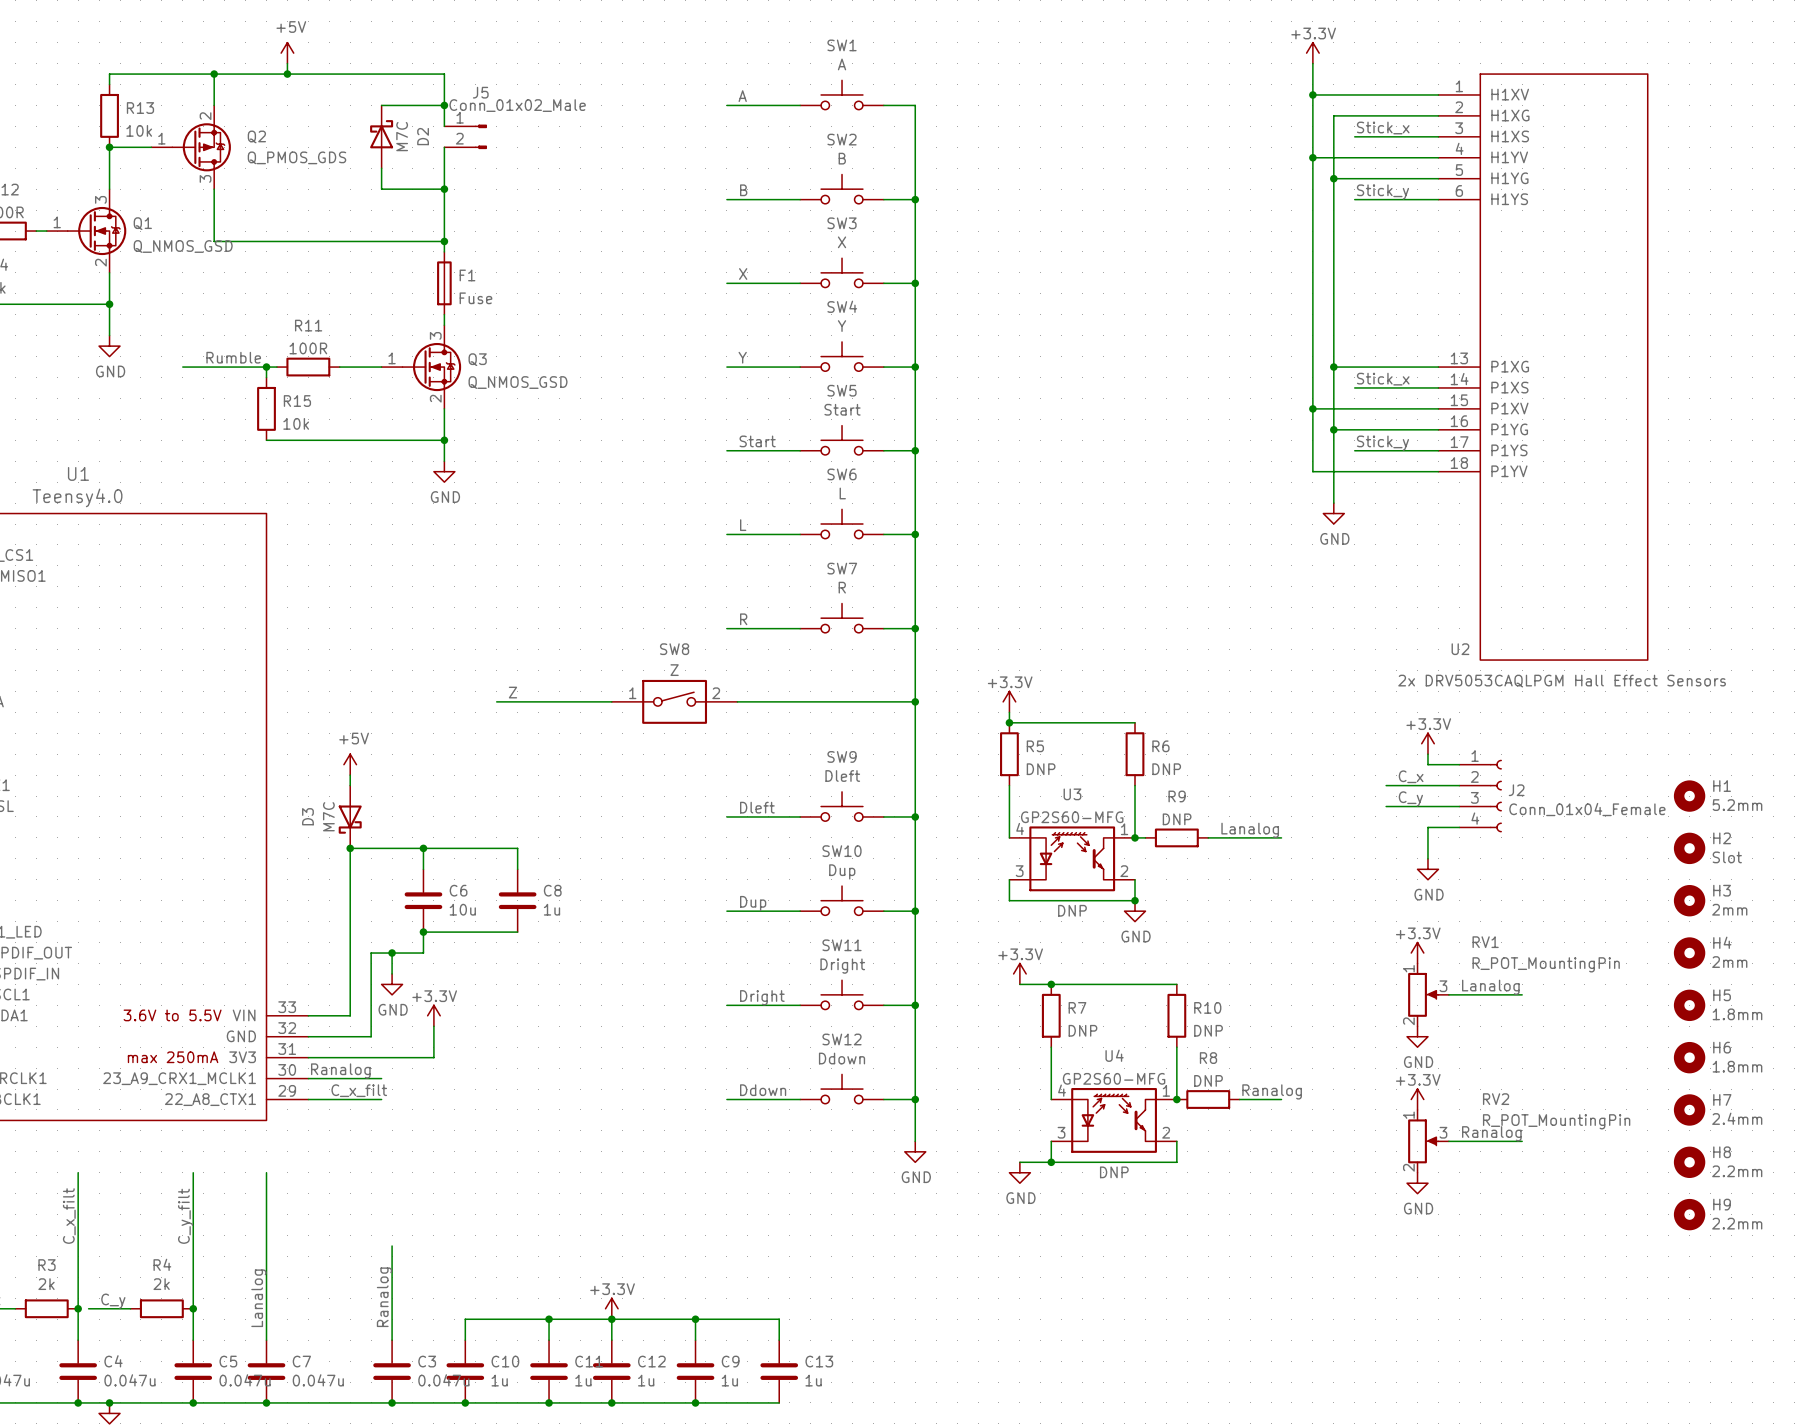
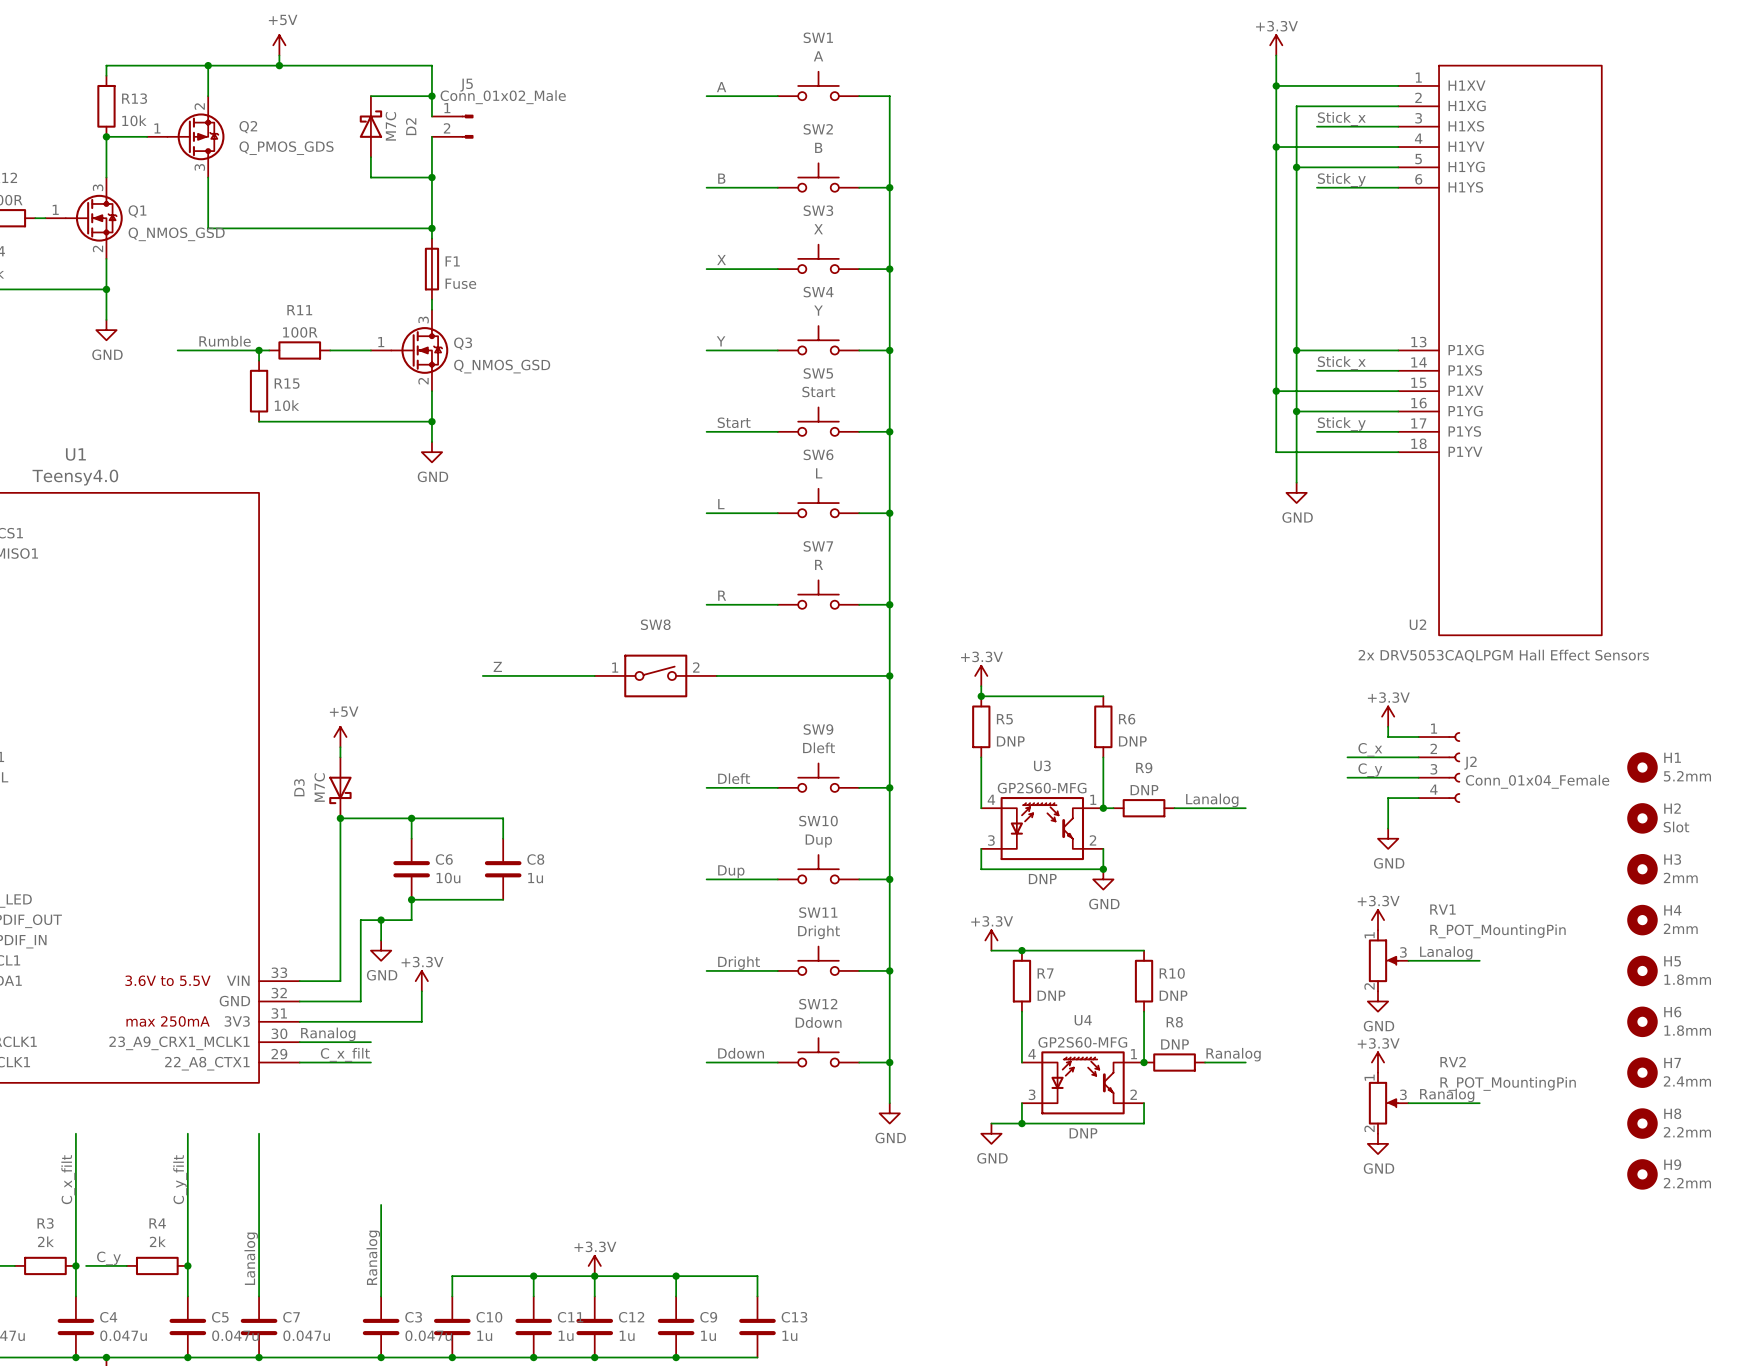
SW8 value: Z (674, 670) -> none

